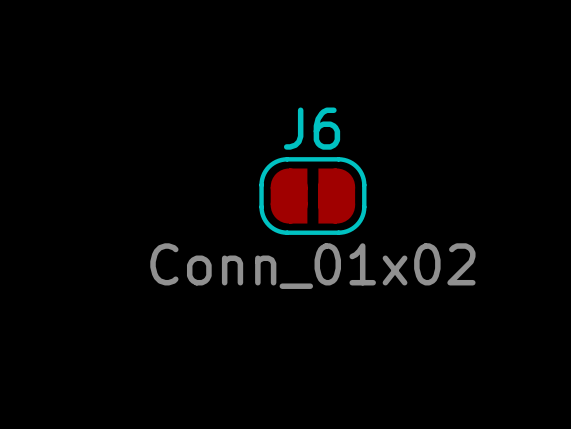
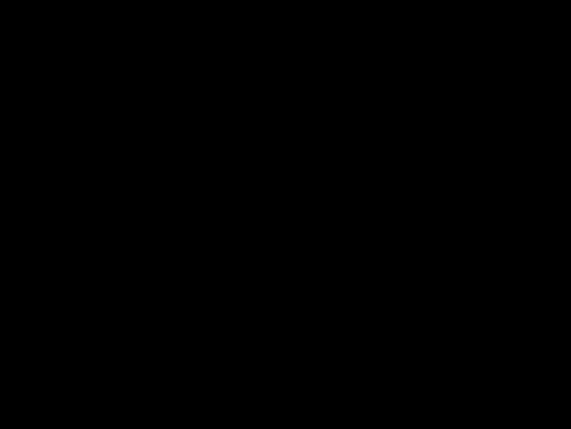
J6: Conn_01x02 (312, 196) -> none

